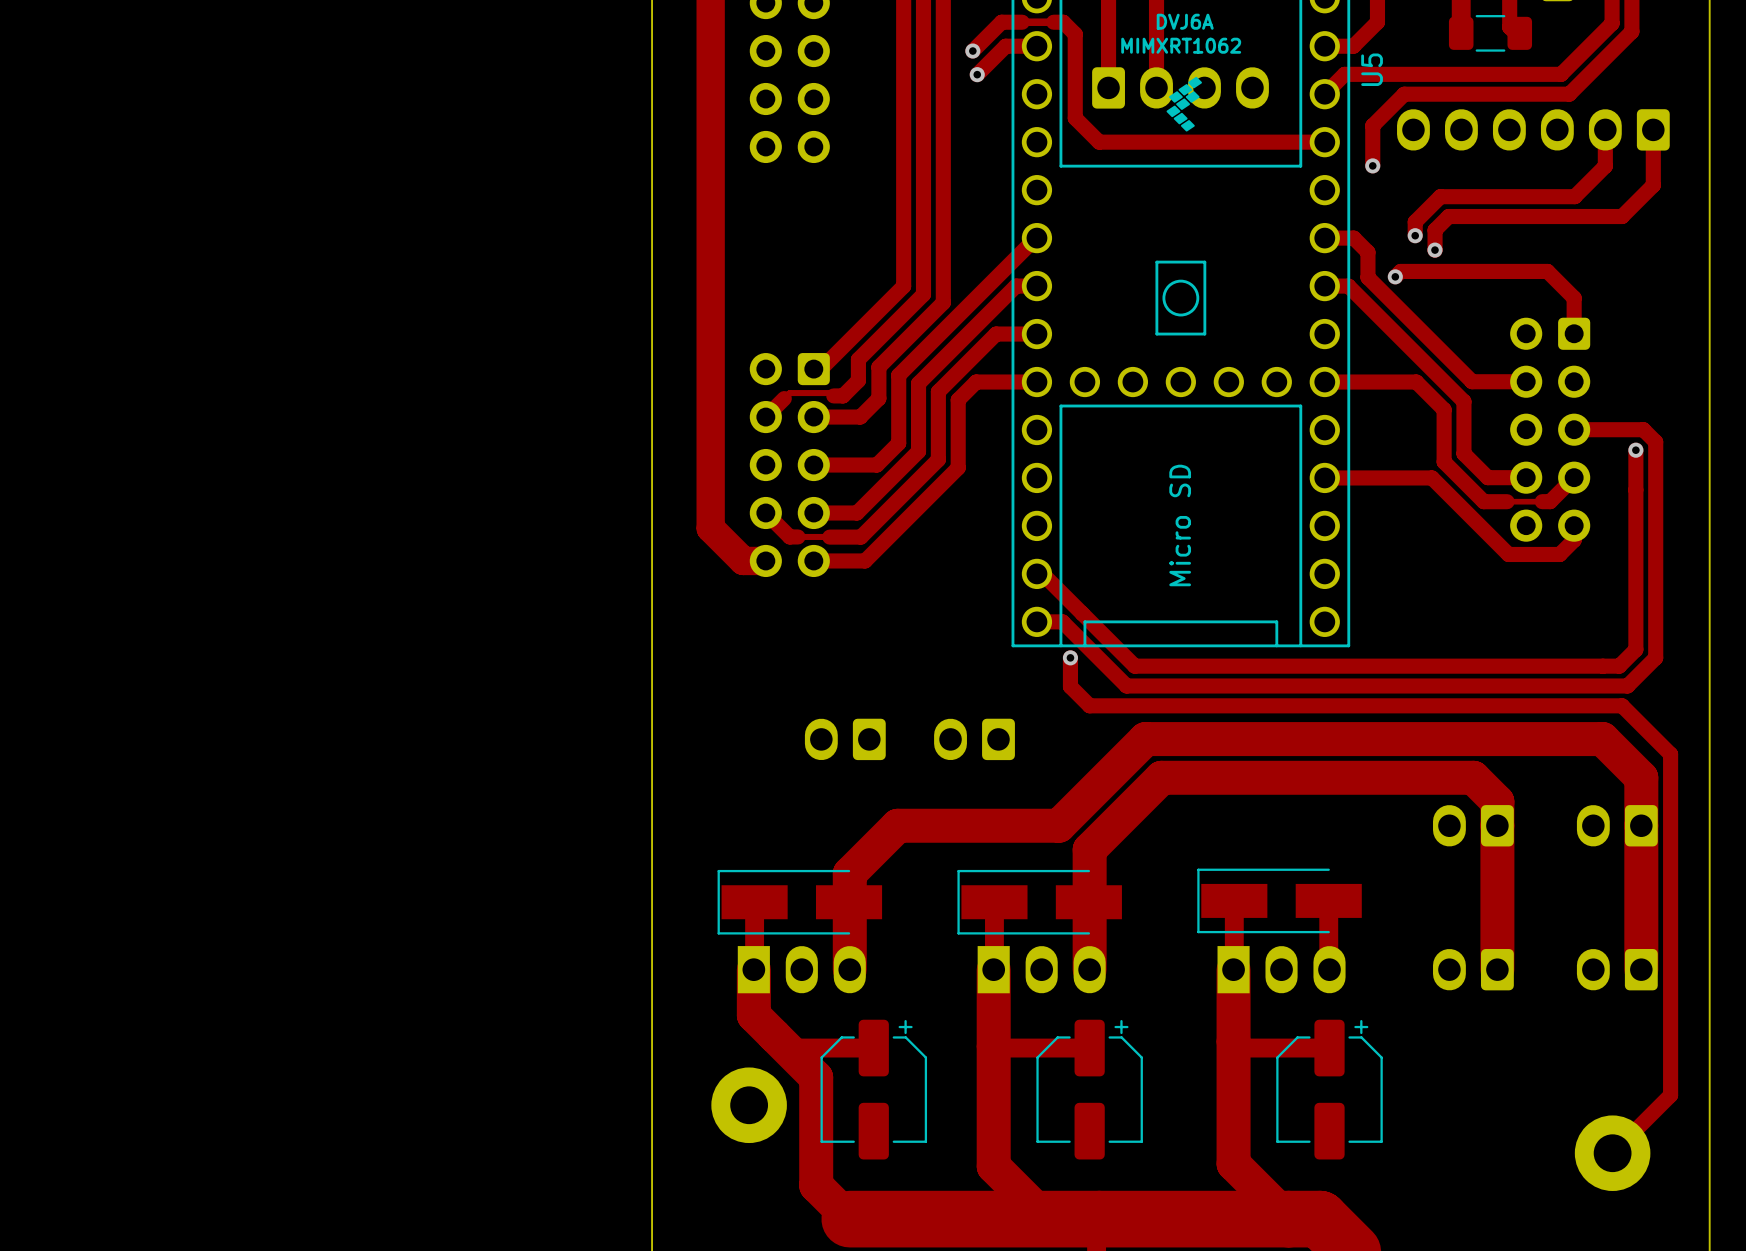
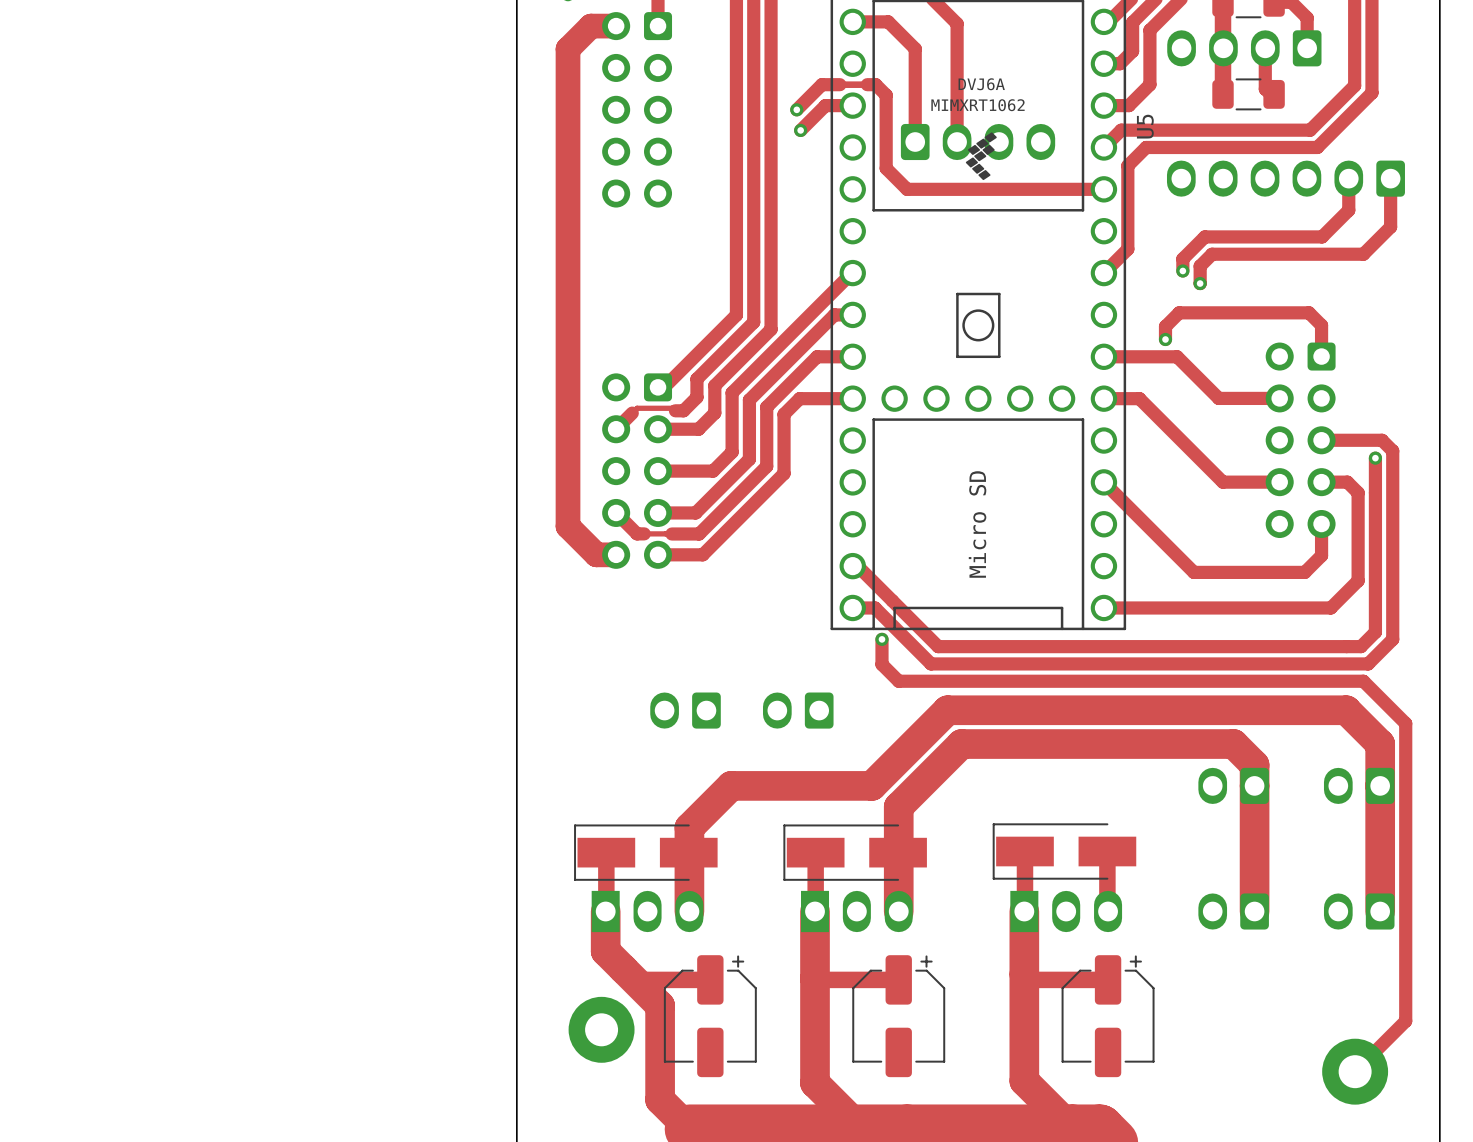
track: (1404, 94) (1372, 125) (1372, 165) -> (1173, 147) (1146, 147) (1127, 165) (1127, 249) (1103, 273)
via: (1372, 165) -> none
track: (1324, 238) (1353, 238) (1367, 252) (1367, 277) (1472, 381) -> (1103, 356) (1177, 356) (1218, 398) (1232, 398)
track: (1395, 276) (1400, 271) (1547, 271) (1559, 283) -> (1165, 339) (1165, 326) (1179, 312) (1309, 312)
via position: (1395, 276) -> (1165, 339)
track: (1324, 286) (1348, 286) (1463, 401) (1463, 453) (1487, 477) -> none
track: (1365, 382) (1416, 382) (1444, 409) (1444, 461) (1483, 501) (1542, 501) -> (1139, 398) (1222, 482) (1246, 482)
track: (1324, 477) (1432, 477) (1508, 554) (1559, 554) (1574, 540) -> (1103, 482) (1193, 572) (1304, 572) (1321, 555) (1321, 536)
track: (1574, 477) (1550, 501) (1542, 501) -> (1321, 482) (1347, 482) (1358, 492) (1358, 580) (1330, 607) (1103, 607)

